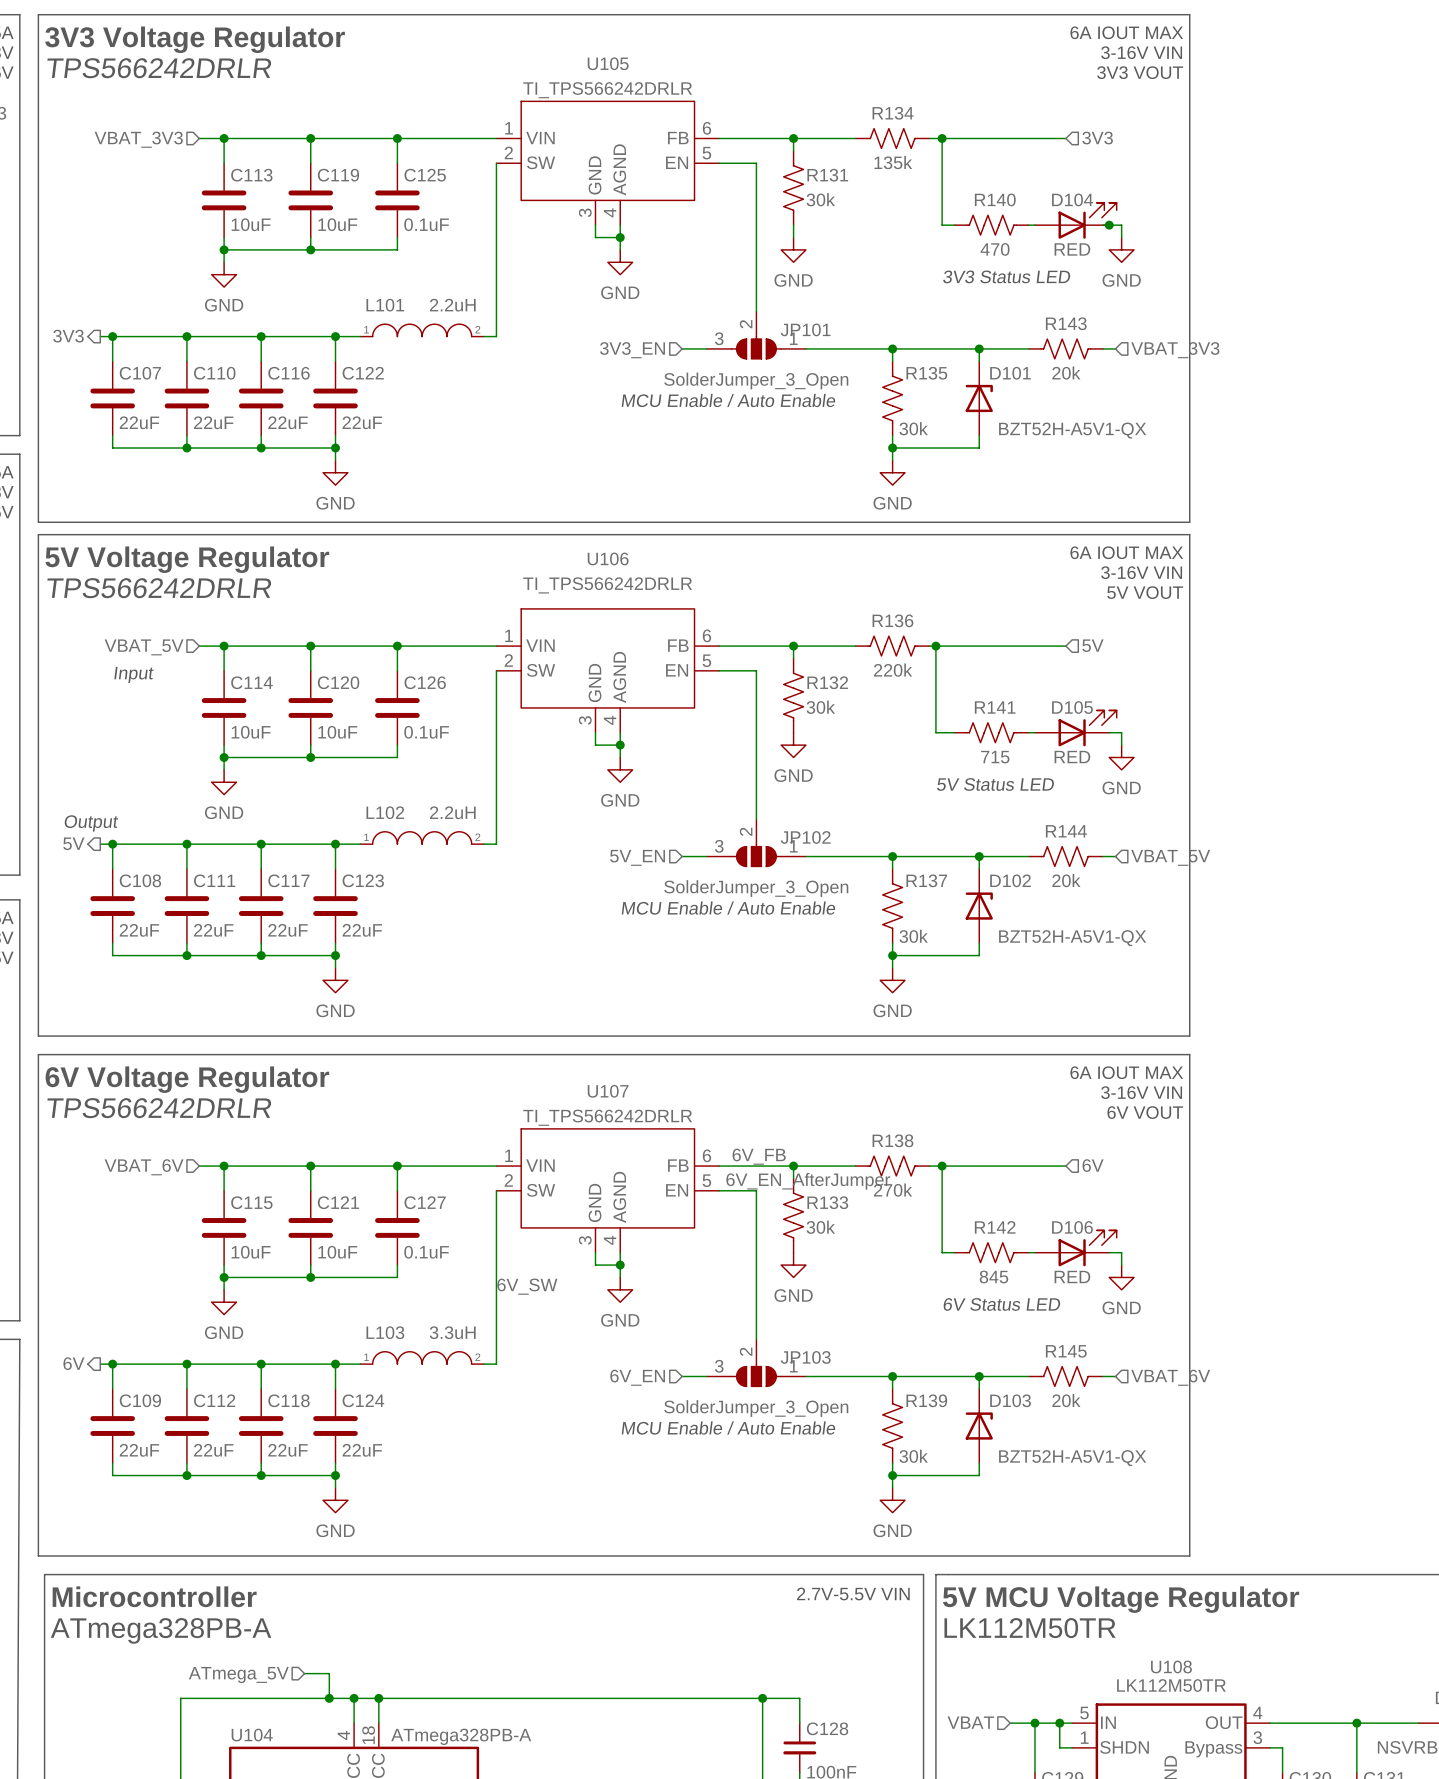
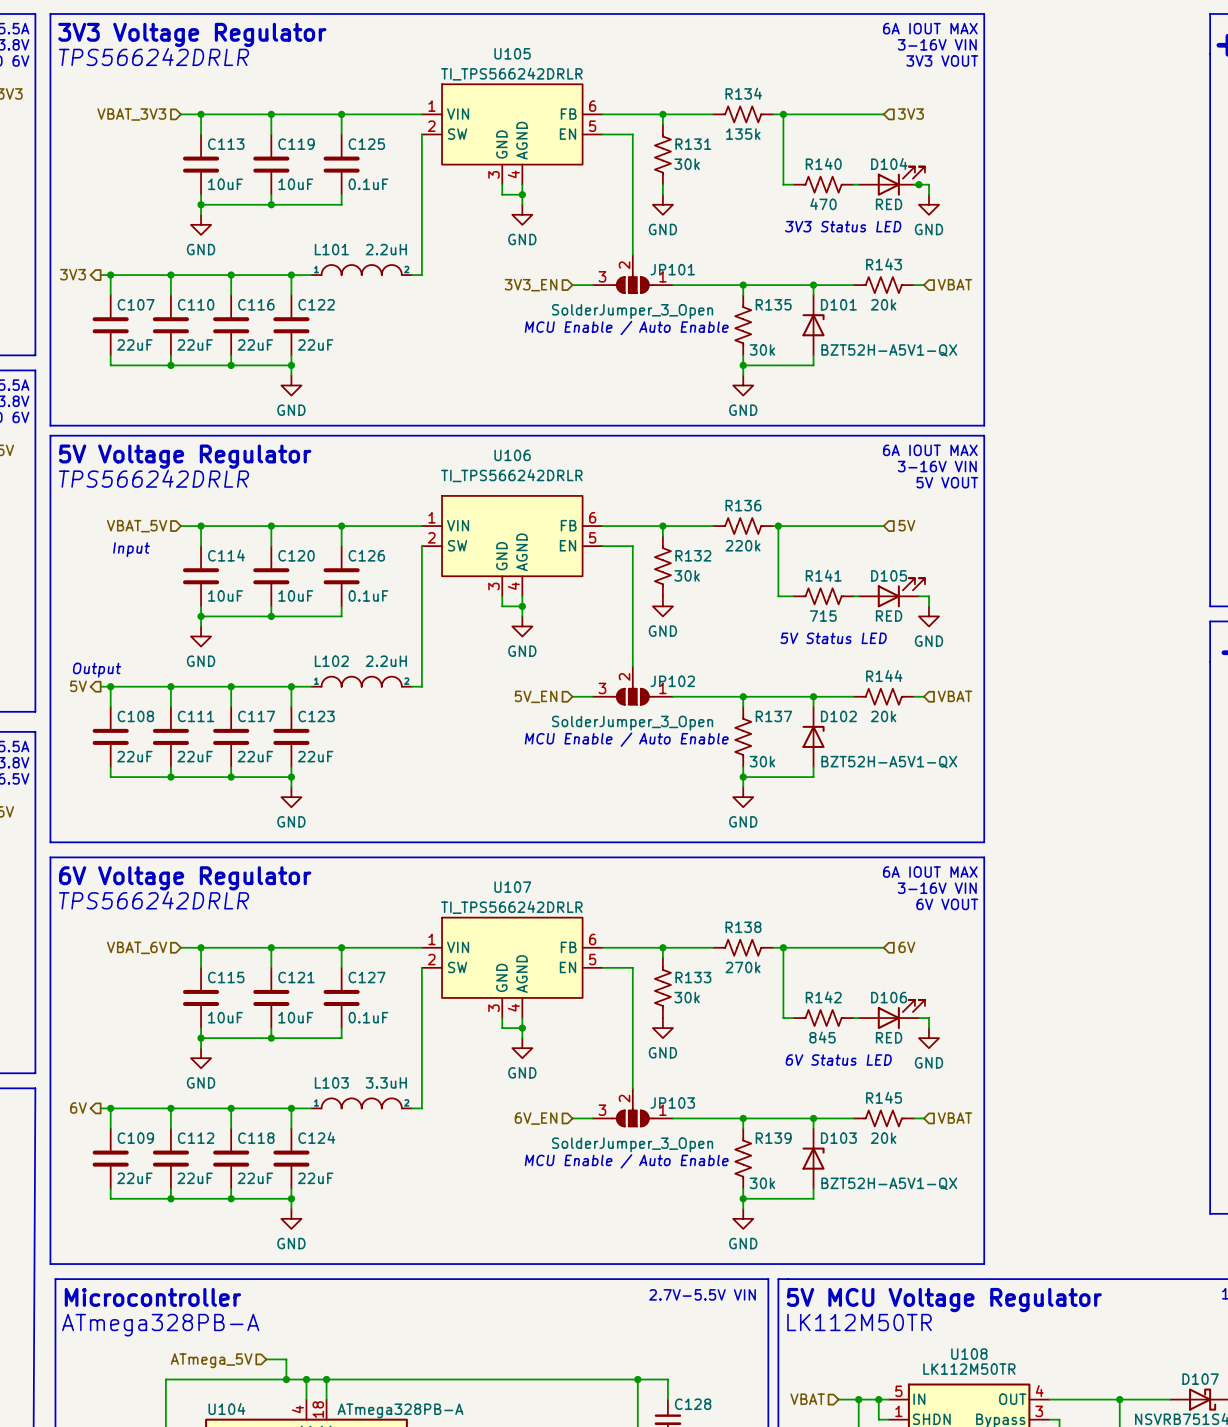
hierarchical label: VBAT_3V3 (1175, 350) -> VBAT (954, 284)
hierarchical label: VBAT_5V (1170, 857) -> VBAT (954, 696)
label: 6V_FB (759, 1156) -> none
label: 6V_EN_AfterJumper (808, 1181) -> none
label: 6V_SW (527, 1286) -> none
hierarchical label: VBAT_6V (1170, 1377) -> VBAT (954, 1118)

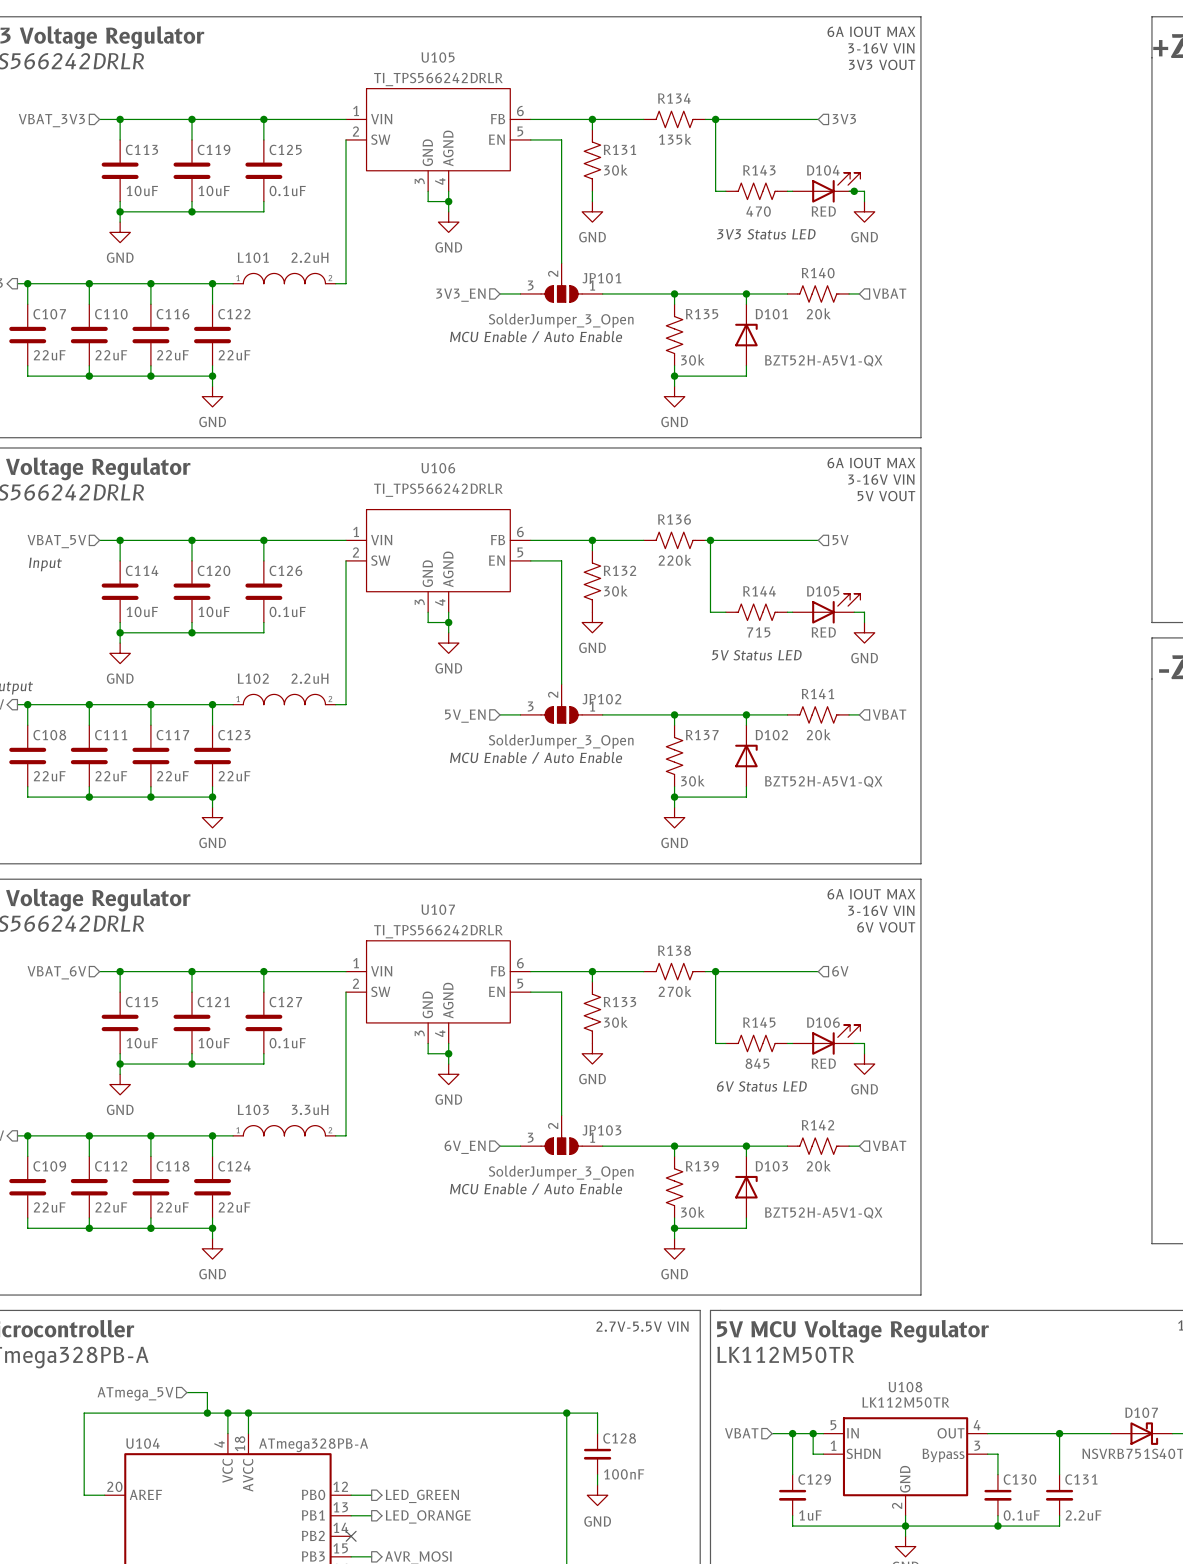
R140 name: R140 (823, 163) -> R143 (759, 170)
R143 name: R143 (884, 264) -> R140 (818, 273)
R141 name: R141 (823, 575) -> R144 (759, 591)
R144 name: R144 (884, 676) -> R141 (817, 694)
R142 name: R142 (823, 997) -> R145 (759, 1022)
R145 name: R145 (884, 1097) -> R142 (817, 1125)

